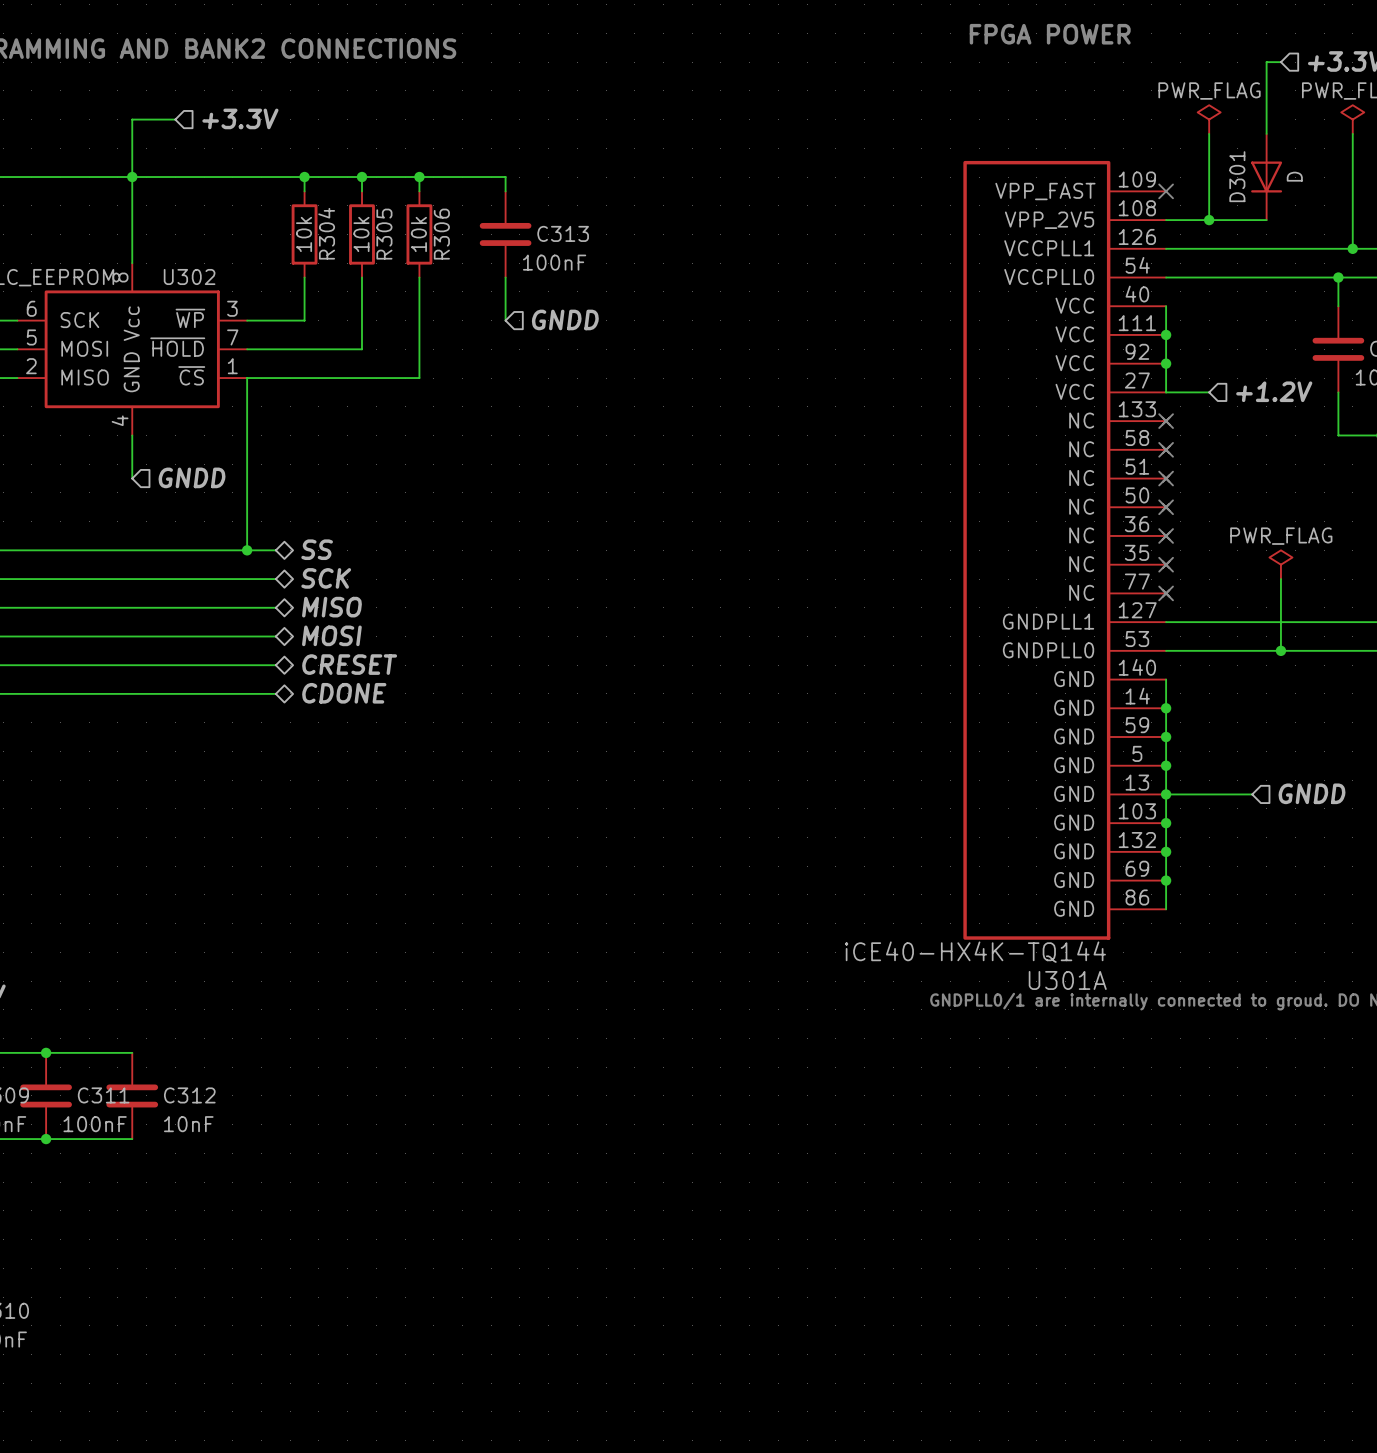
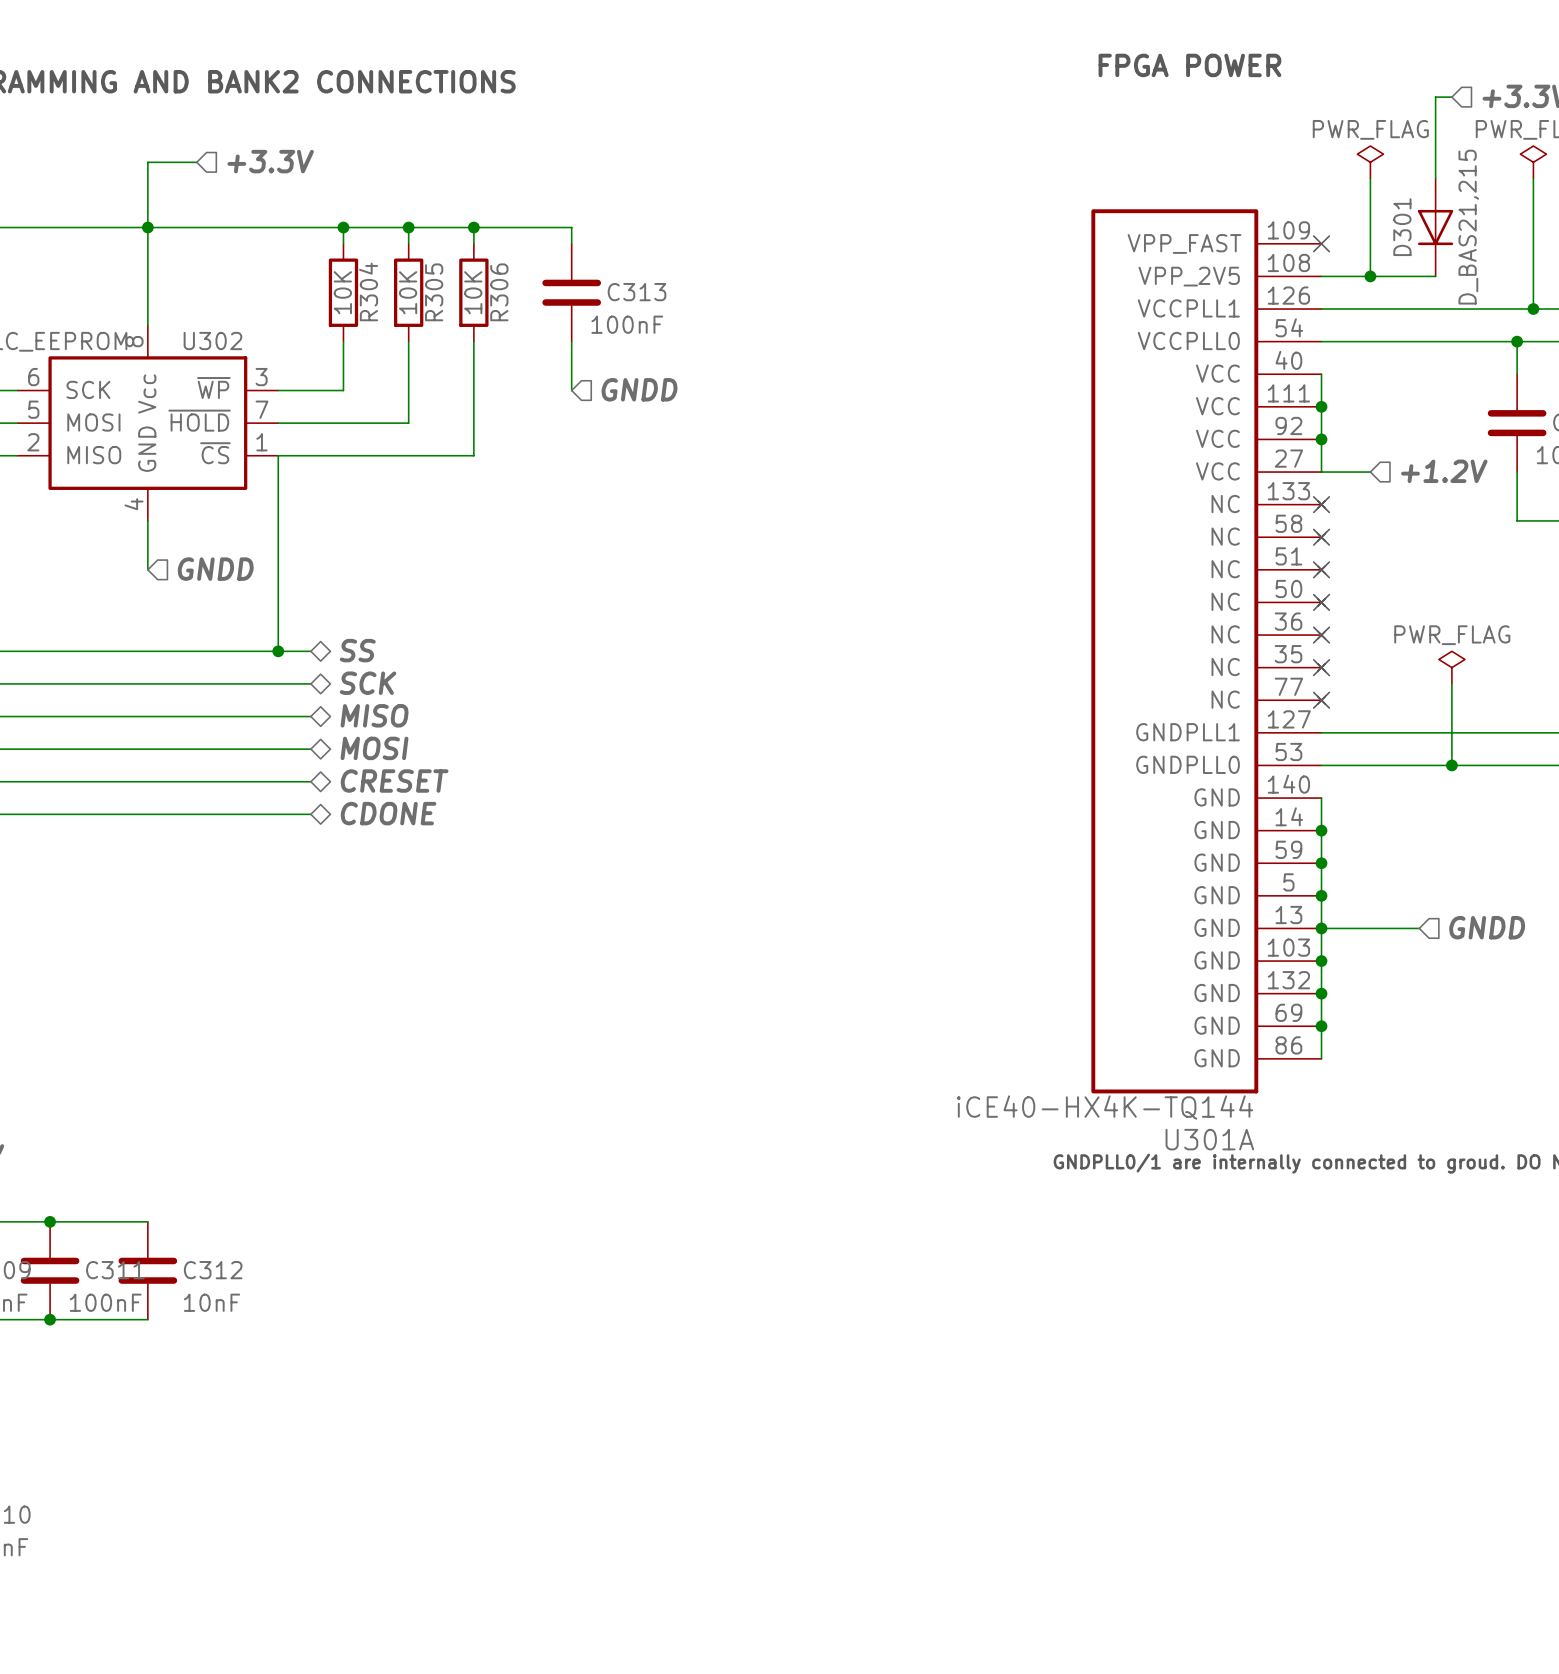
D301 value: D (1294, 176) -> D_BAS21,215 (1468, 227)
R304 value: 10k (304, 234) -> 10K (342, 292)
R305 value: 10k (361, 234) -> 10K (408, 292)
R306 value: 10k (418, 234) -> 10K (473, 292)

